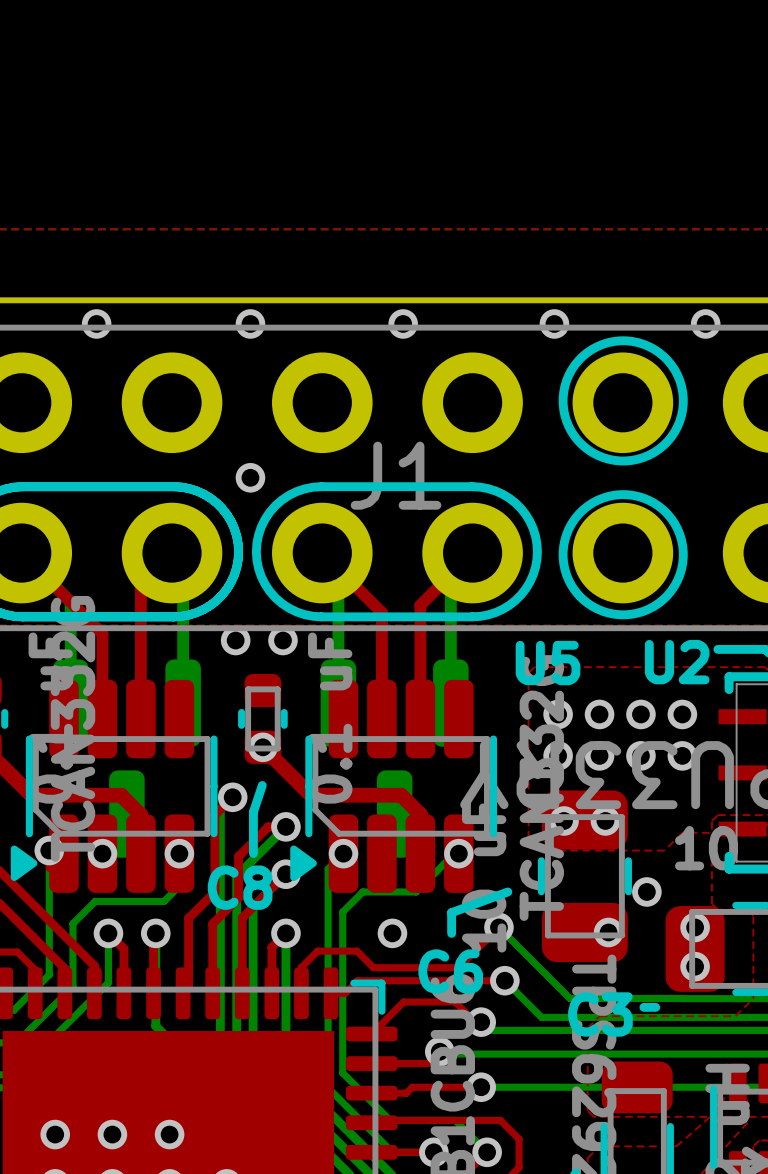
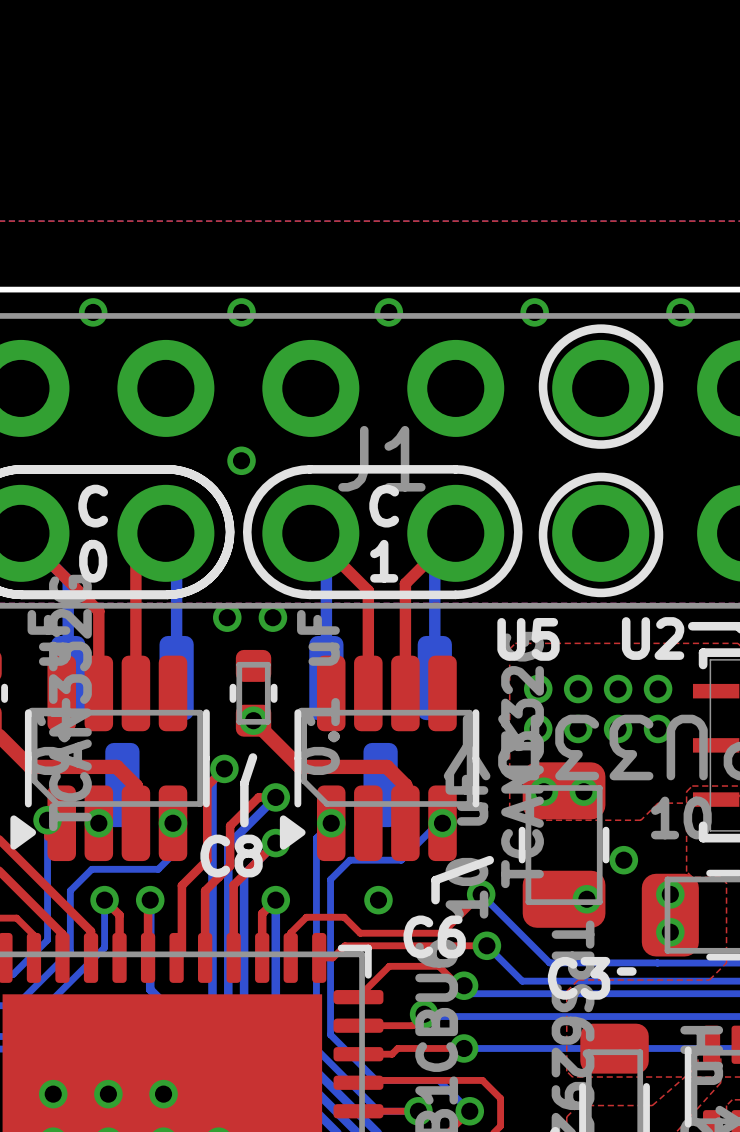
text: none -> C (93, 506)
text: none -> C (384, 506)
text: none -> 0 (93, 561)
text: none -> 1 (384, 561)

